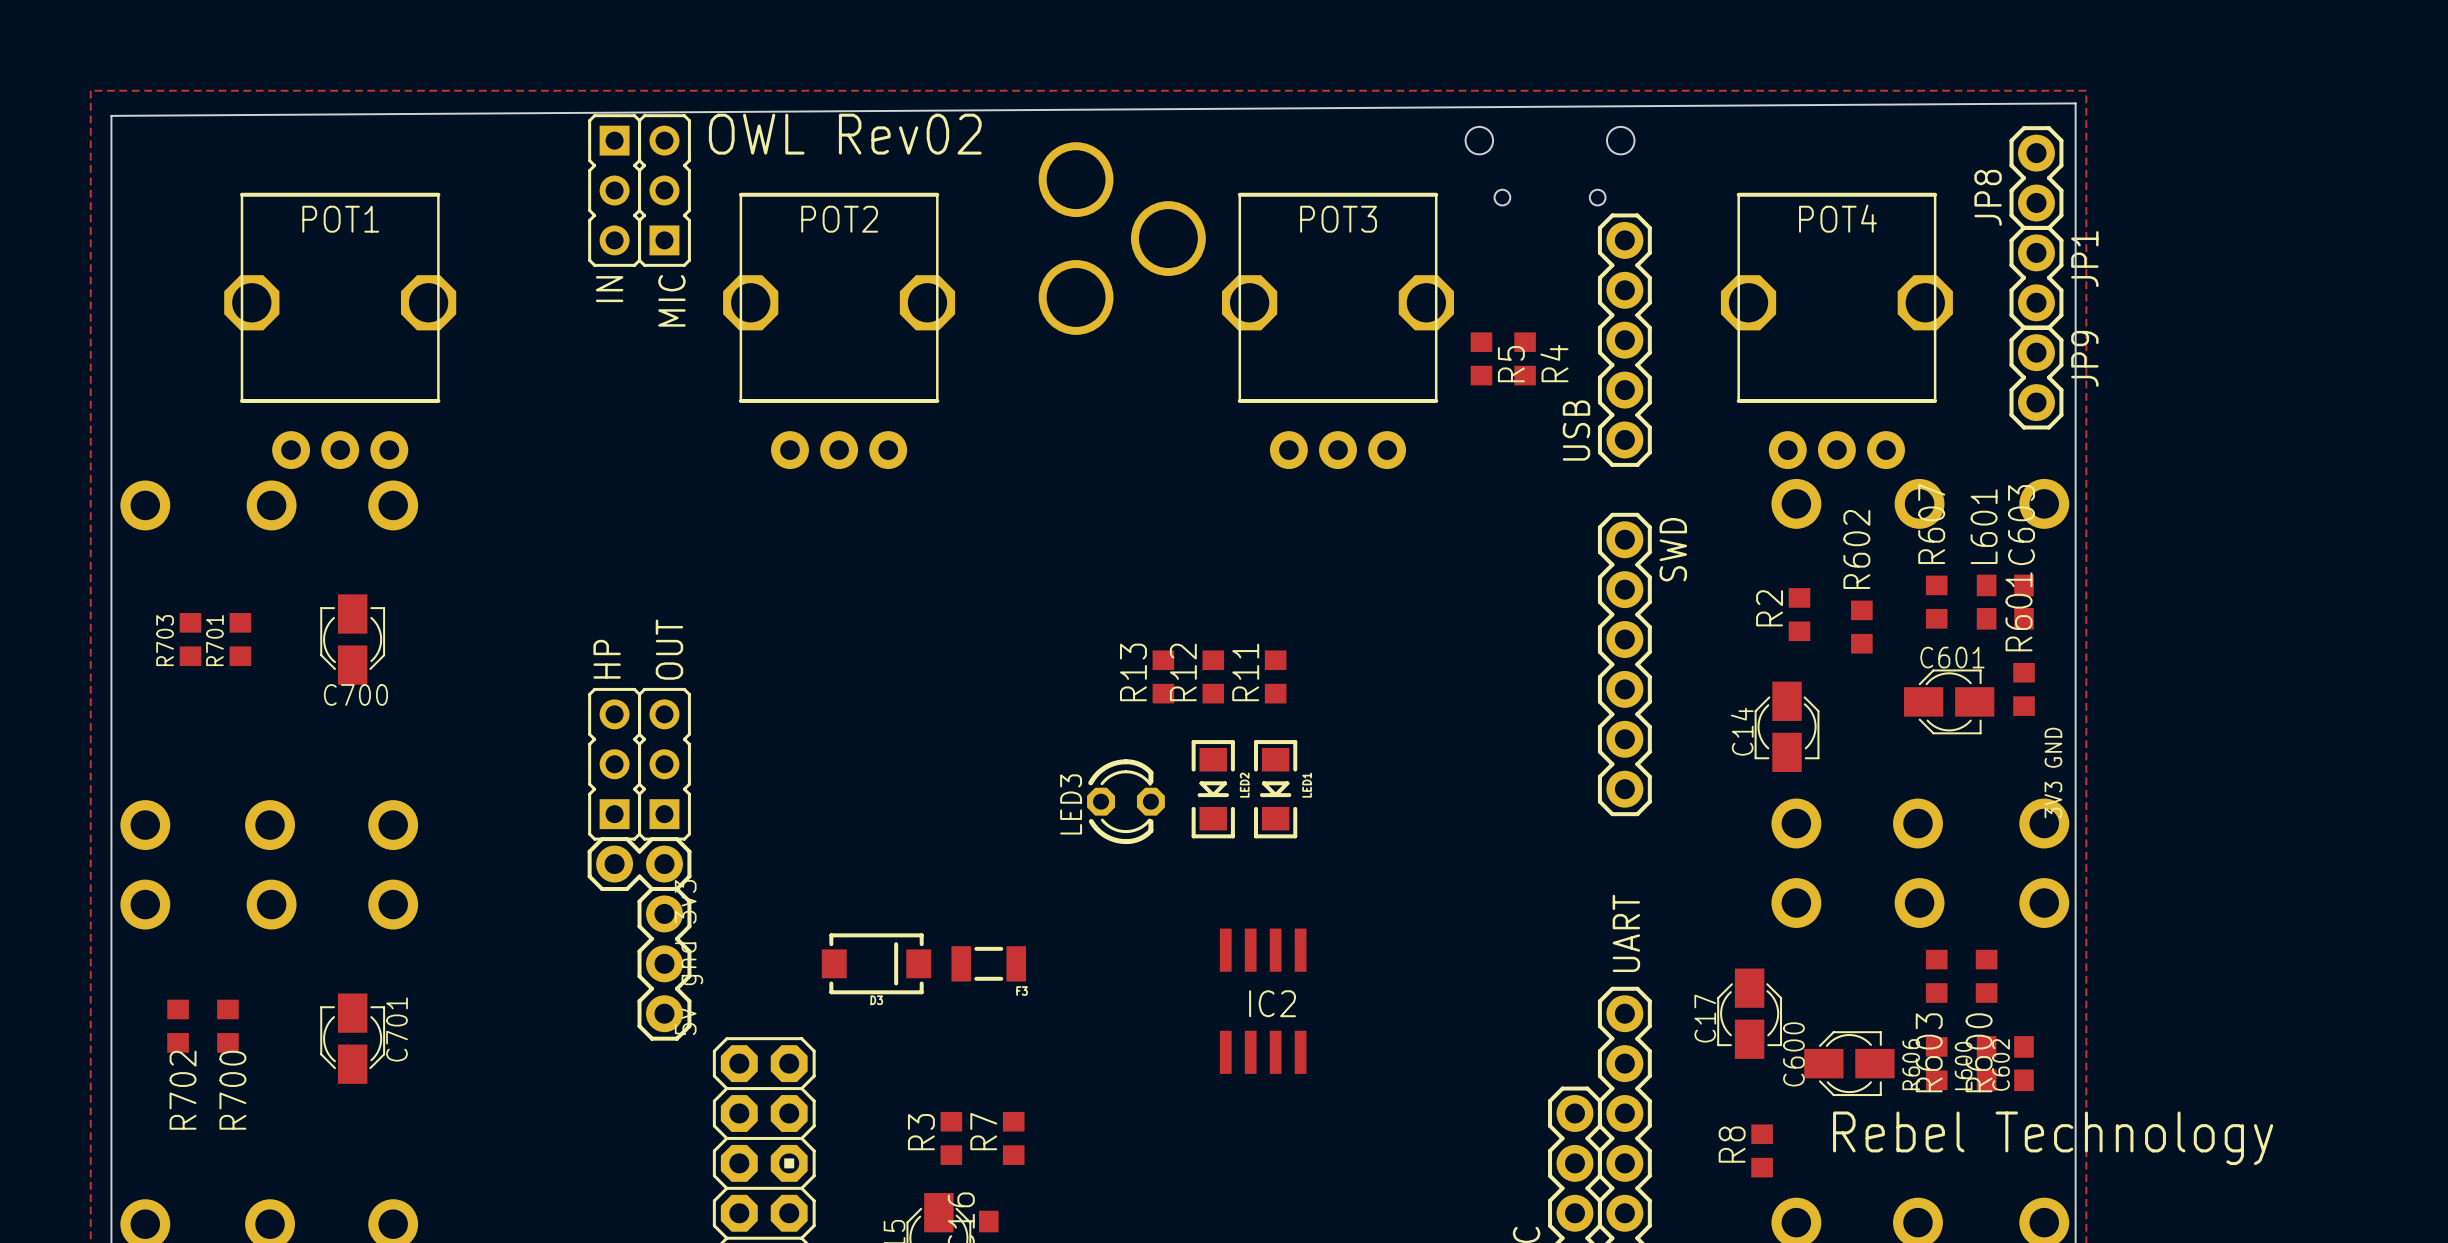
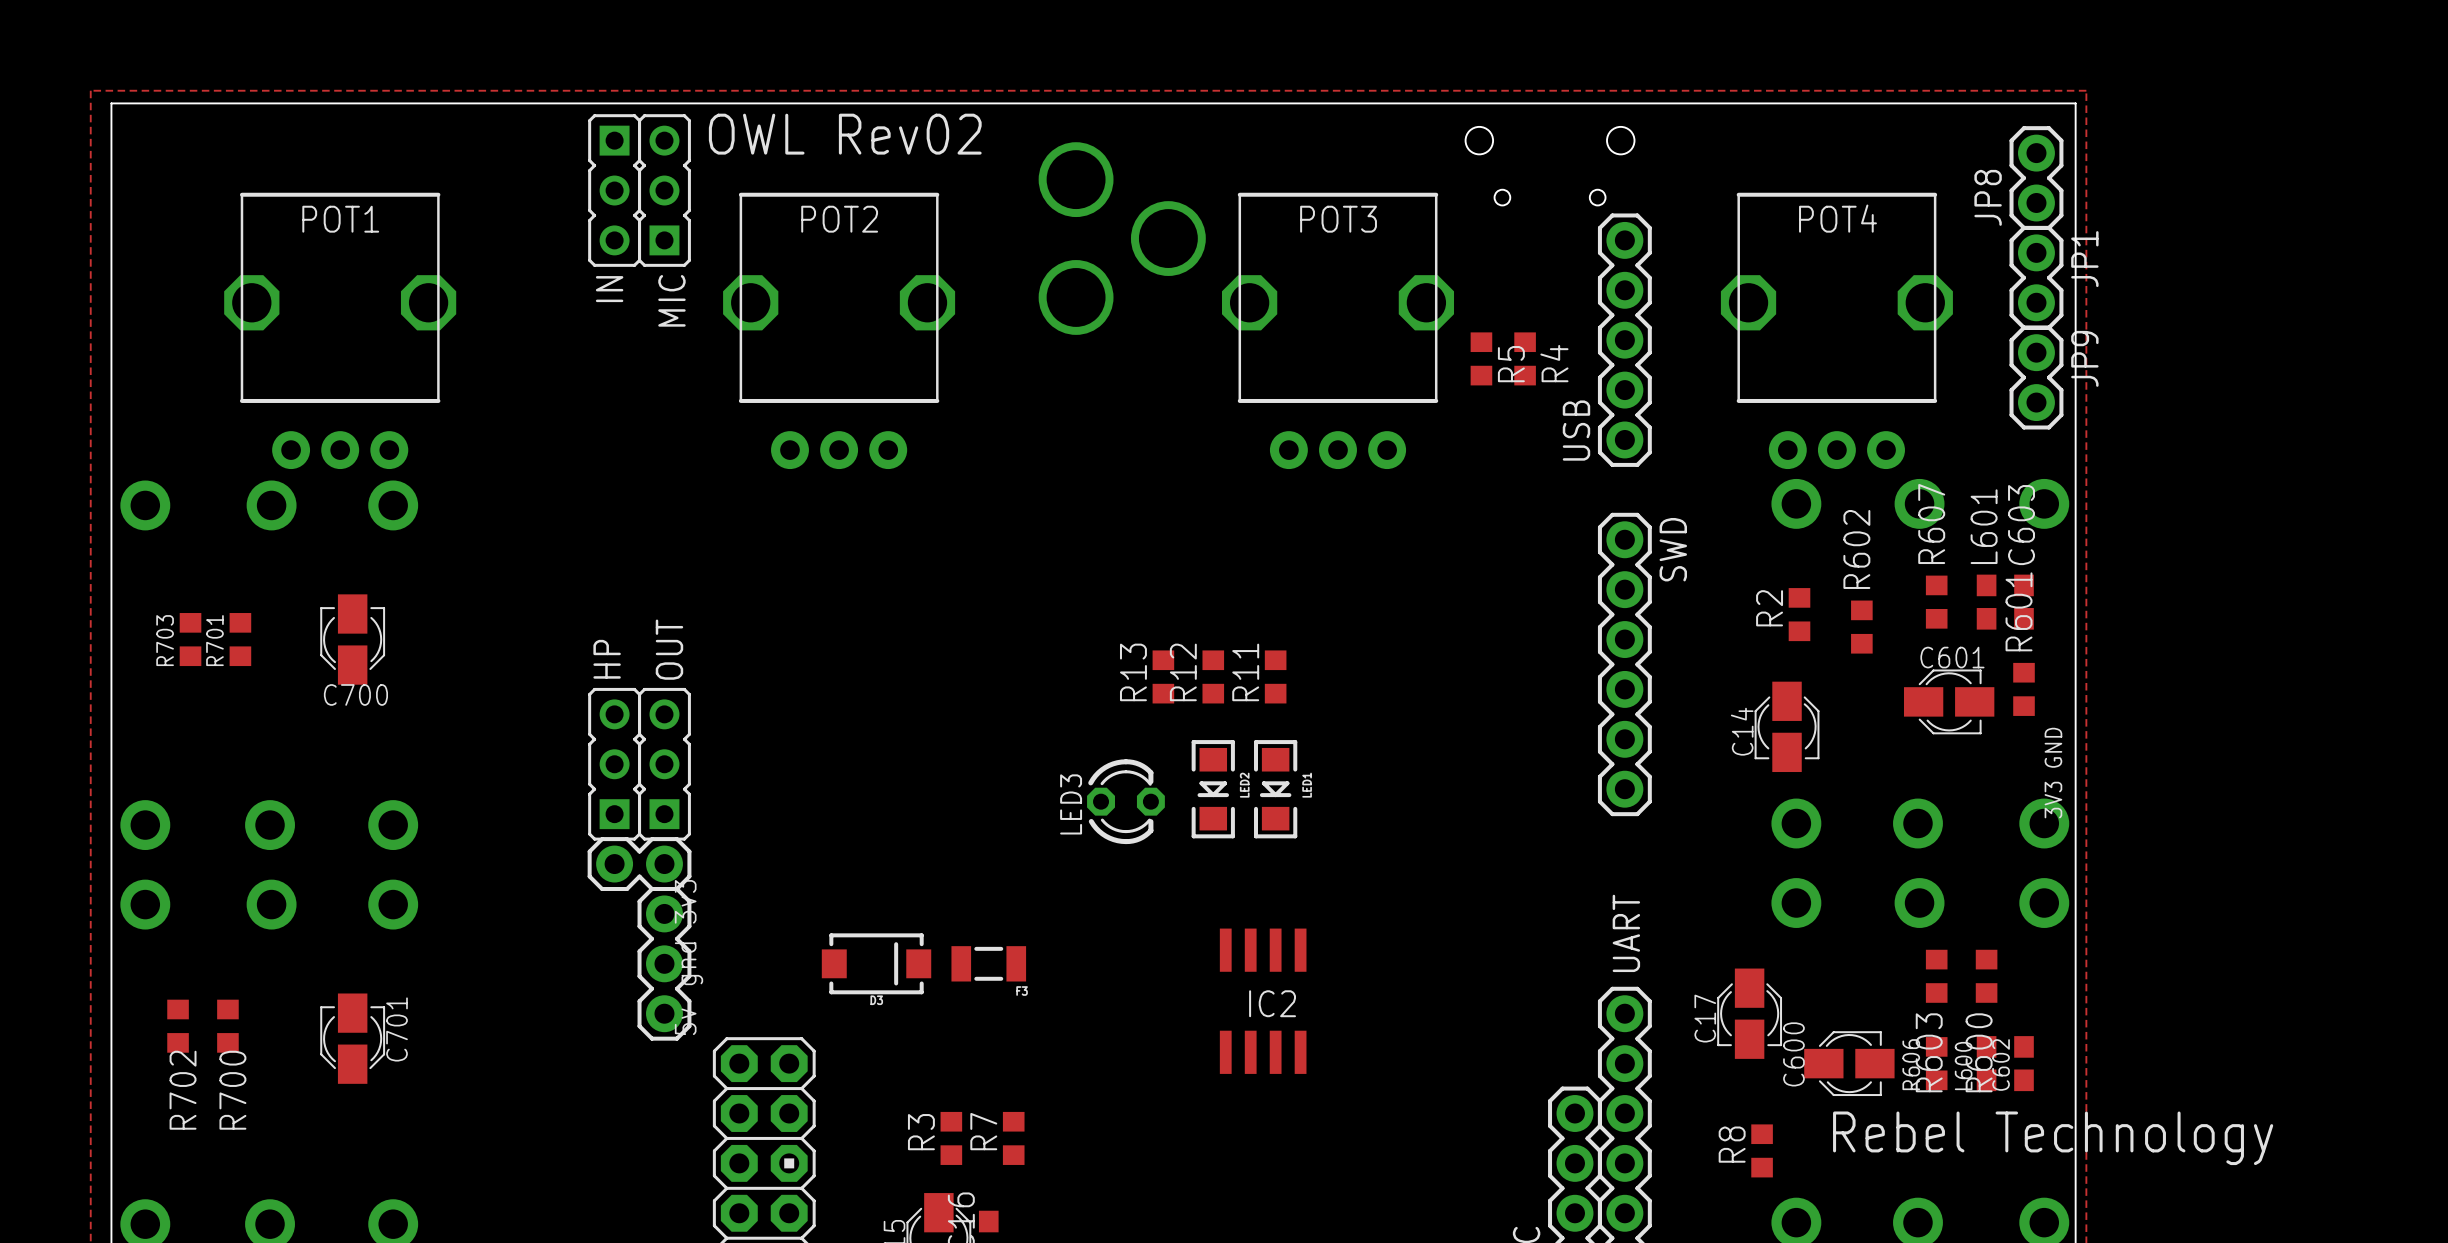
board edge: (2075, 103) (111, 115) -> (2075, 103) (111, 103) (111, 115)

